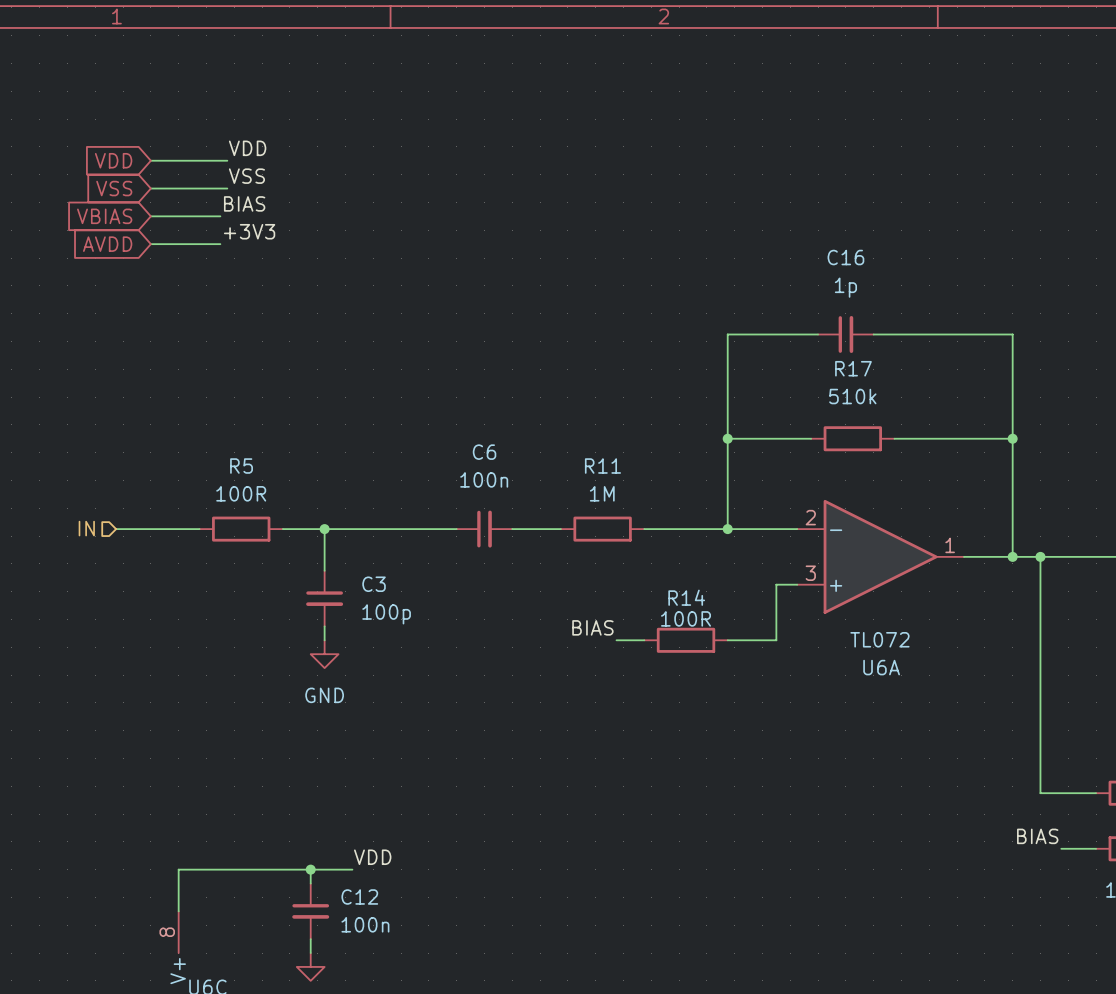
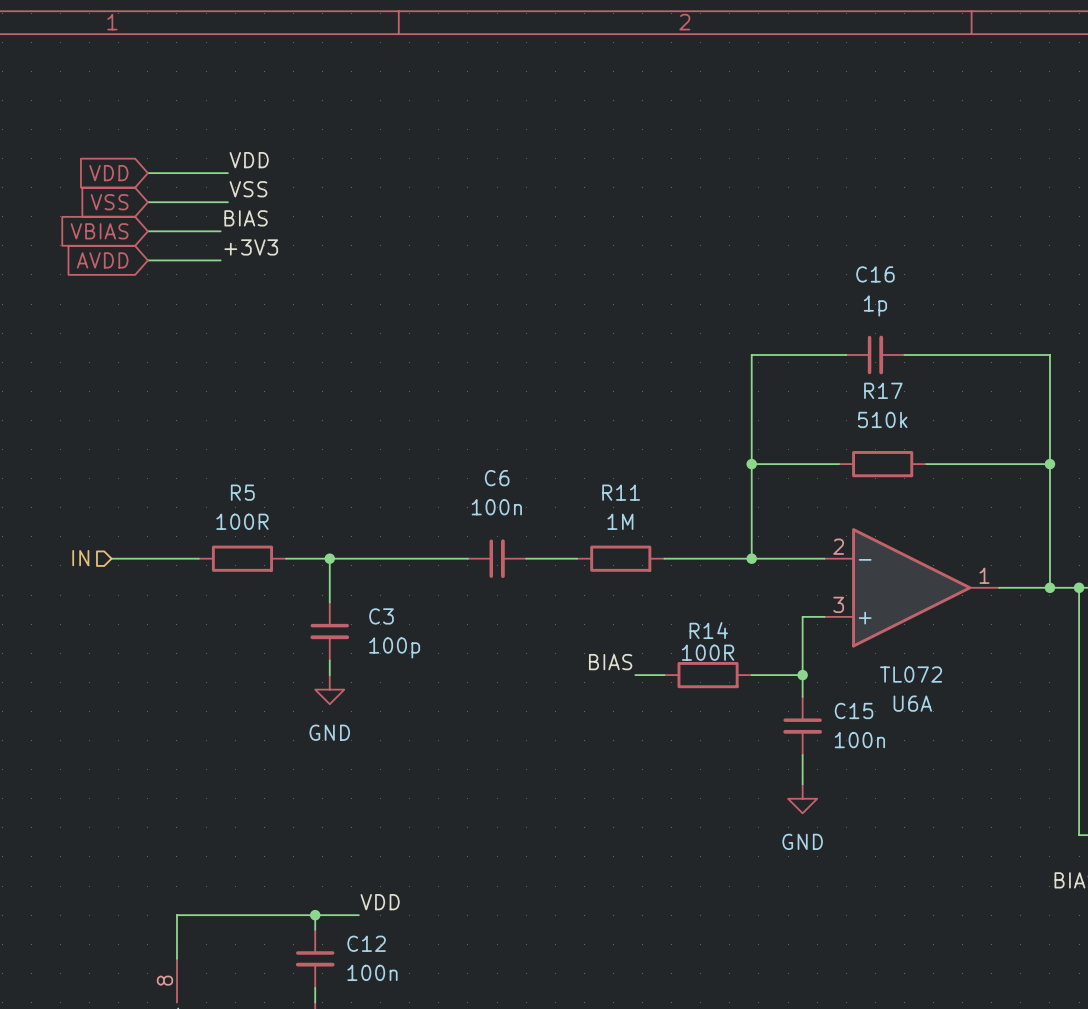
wire: none -> (802, 675) (802, 696)
junction: none -> (802, 675)
C15: none -> 100n (802, 726)
wire: none -> (802, 755) (802, 784)
power symbol: none -> GND (802, 798)

